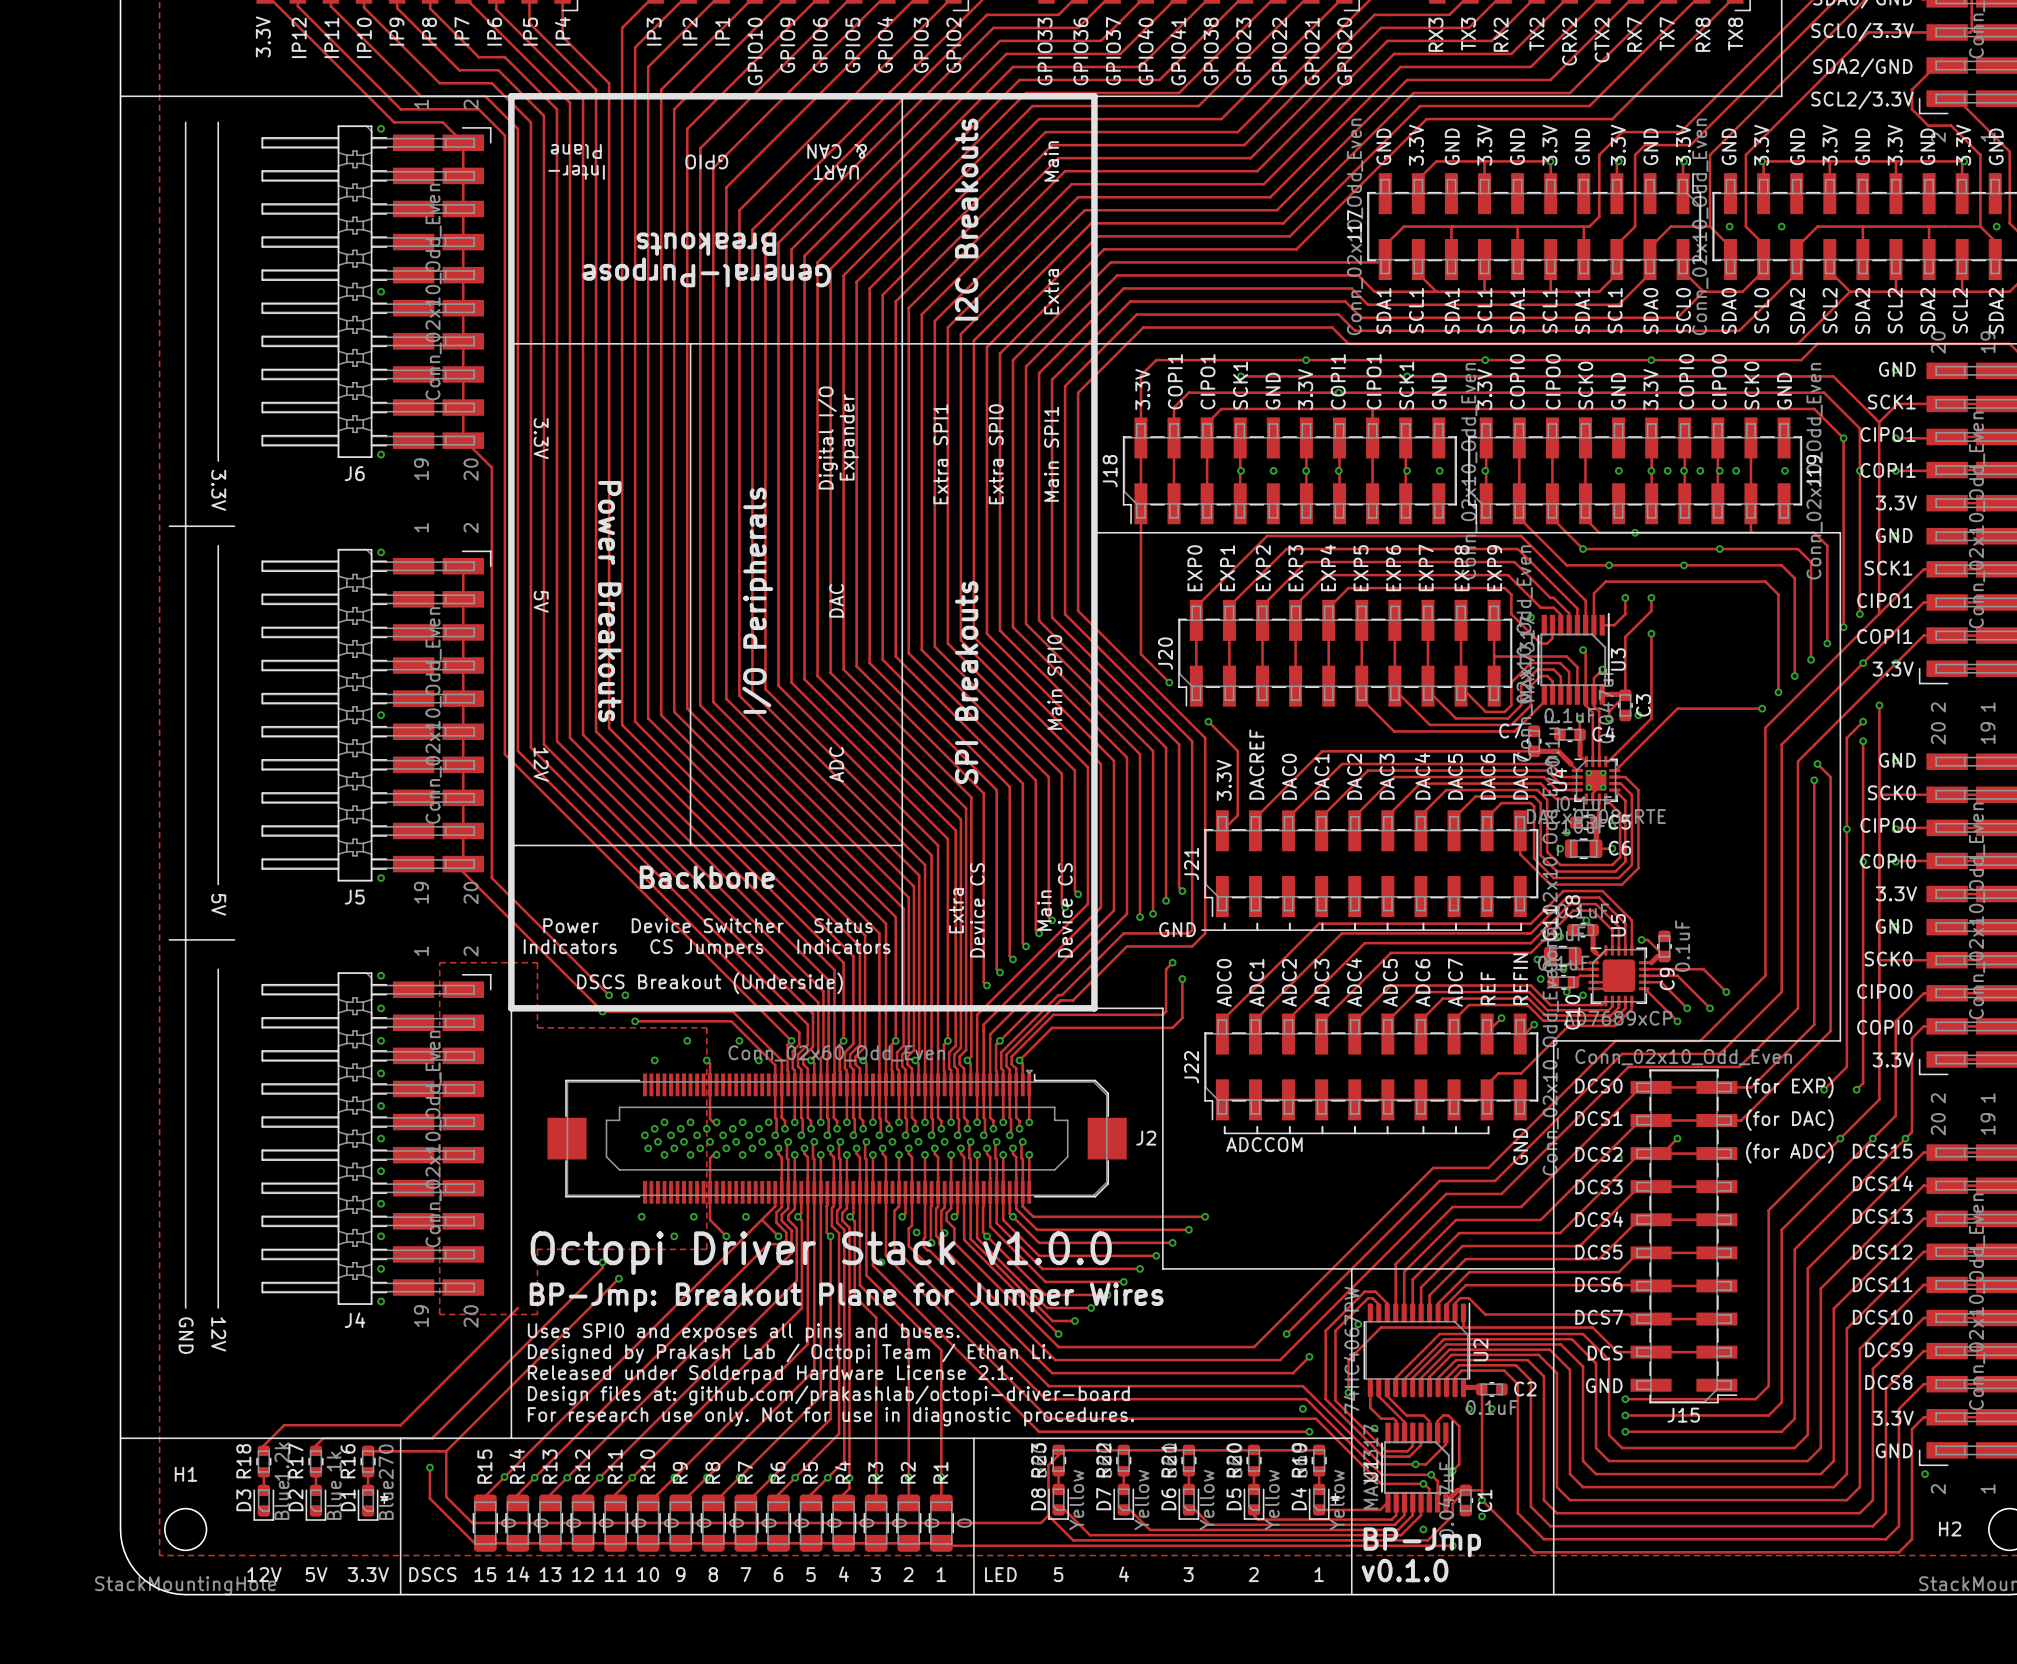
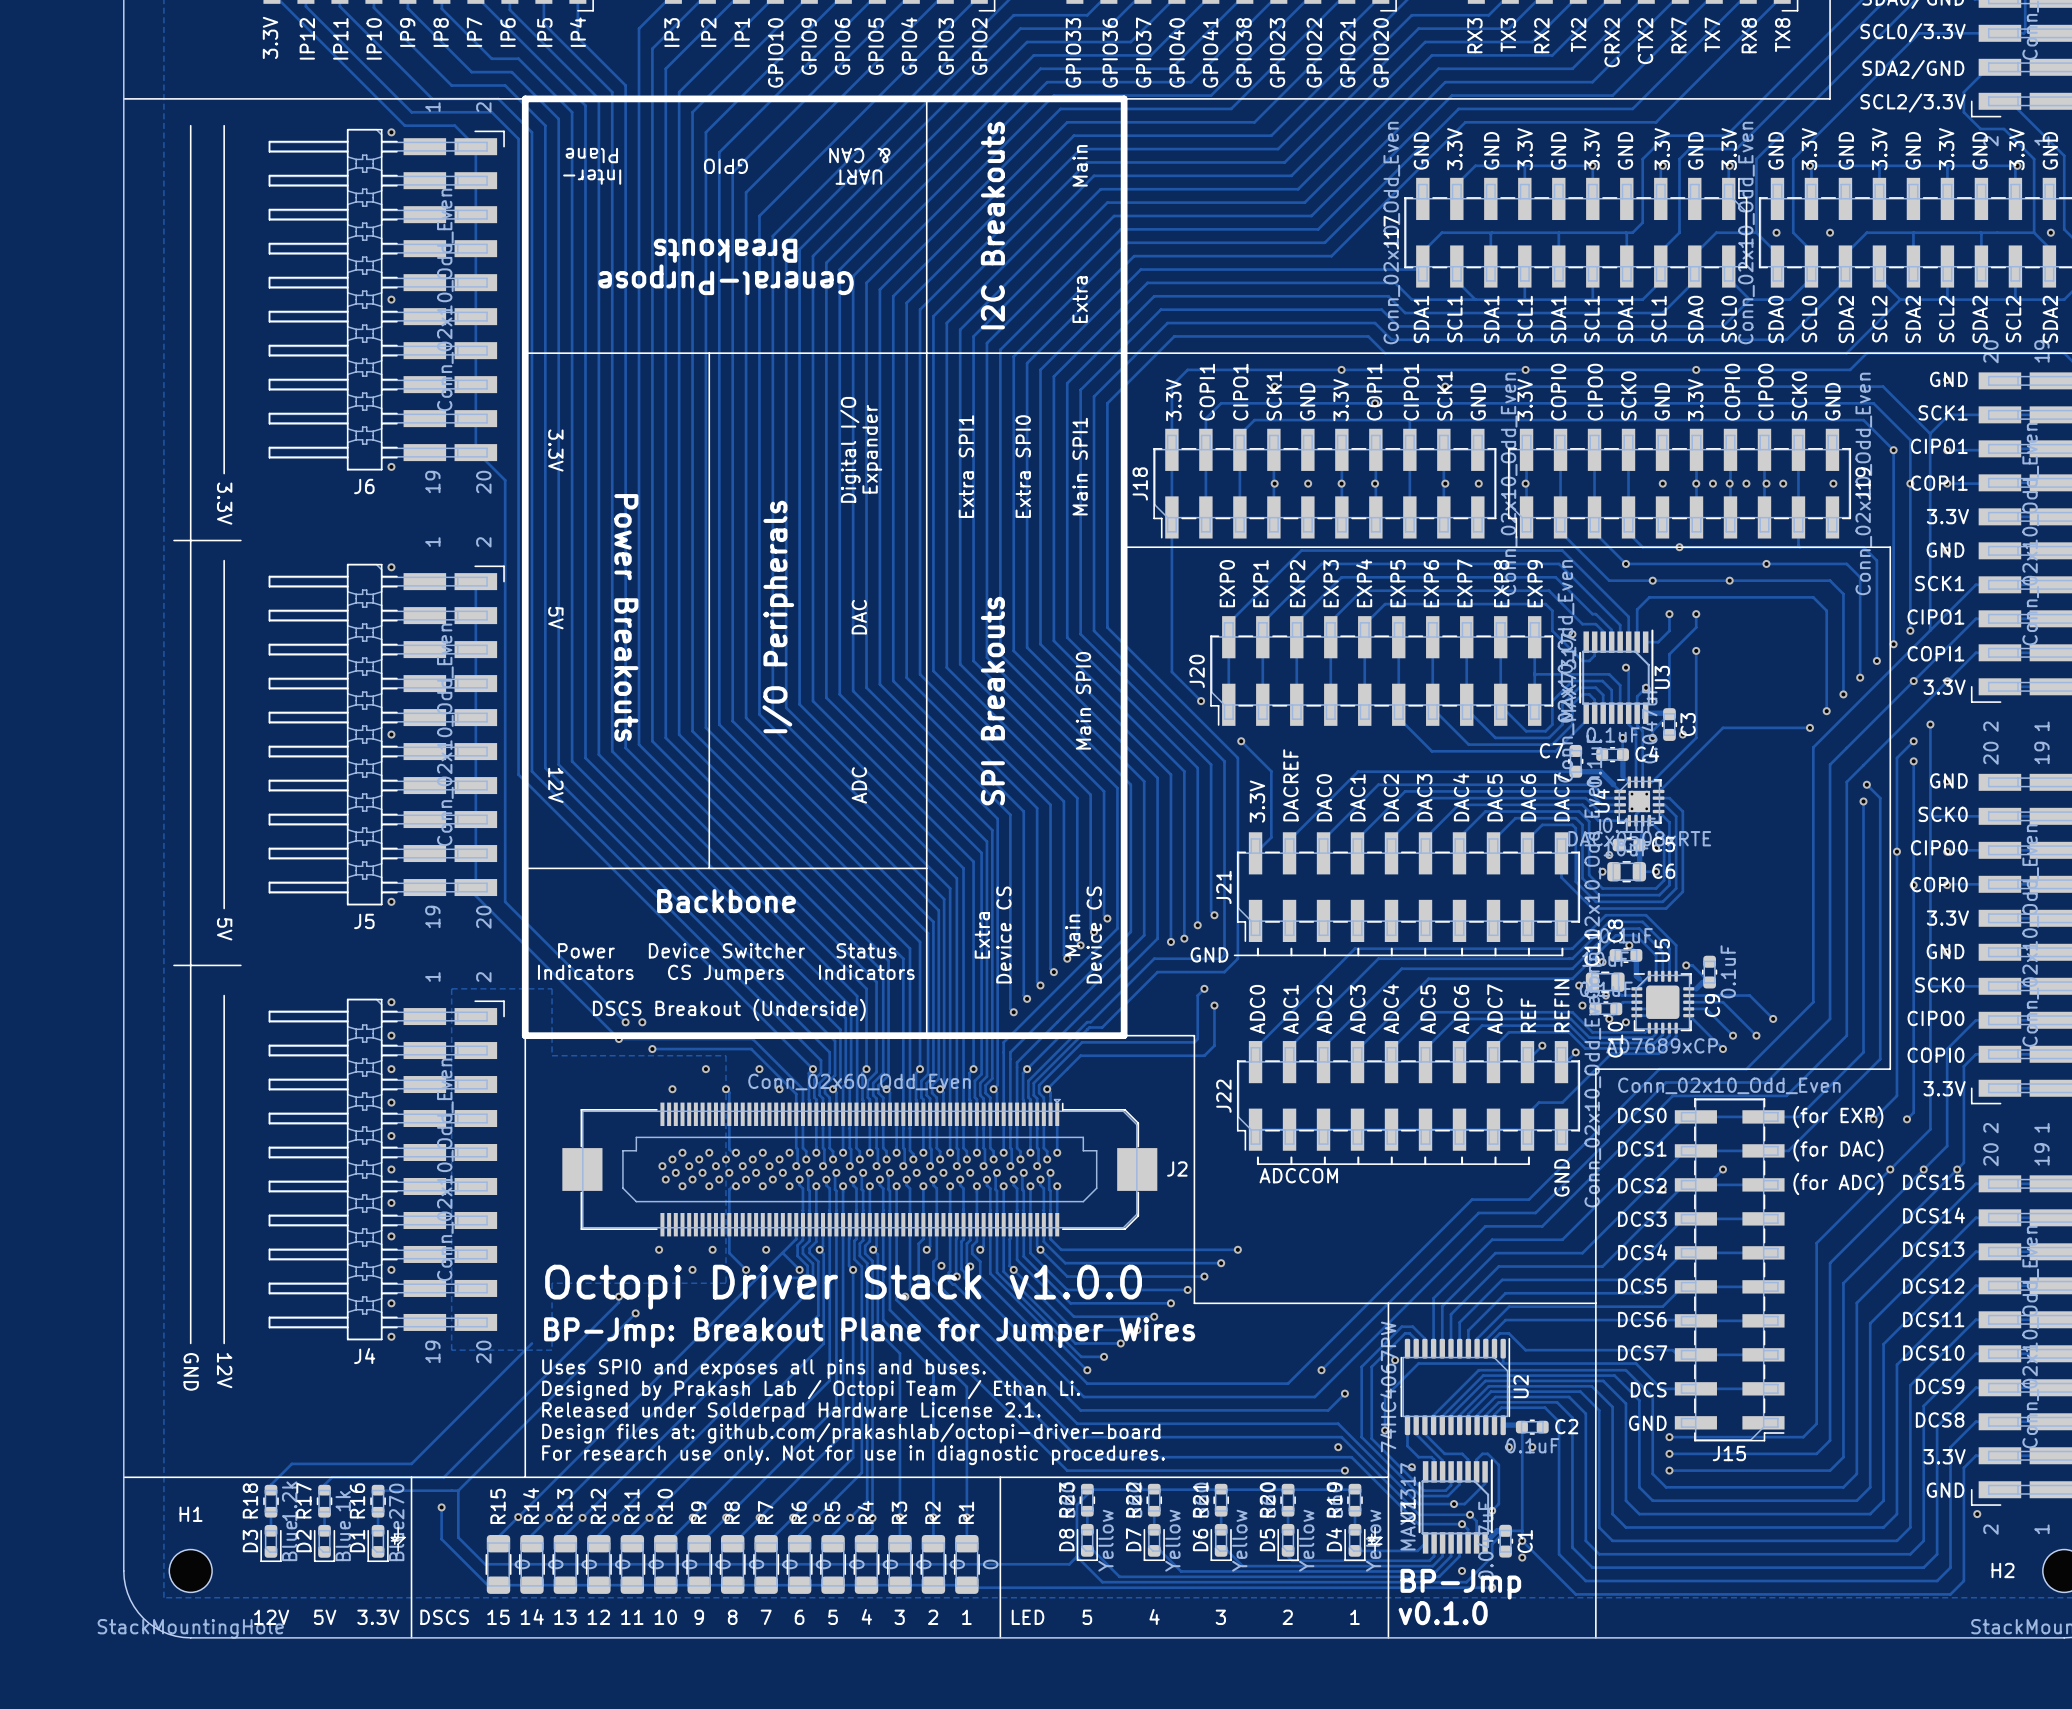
line: none -> (398, 1527) (398, 1537) (404, 1537) (398, 1544) (398, 1550)
line: none -> (1375, 1527) (1375, 1537) (1381, 1537) (1375, 1544) (1375, 1550)
line: none -> (1368, 1544) (1381, 1544)

